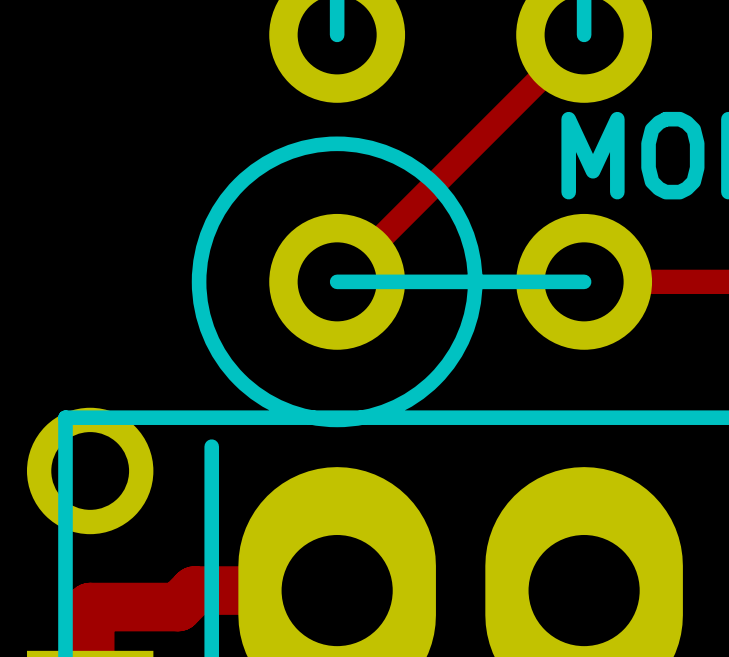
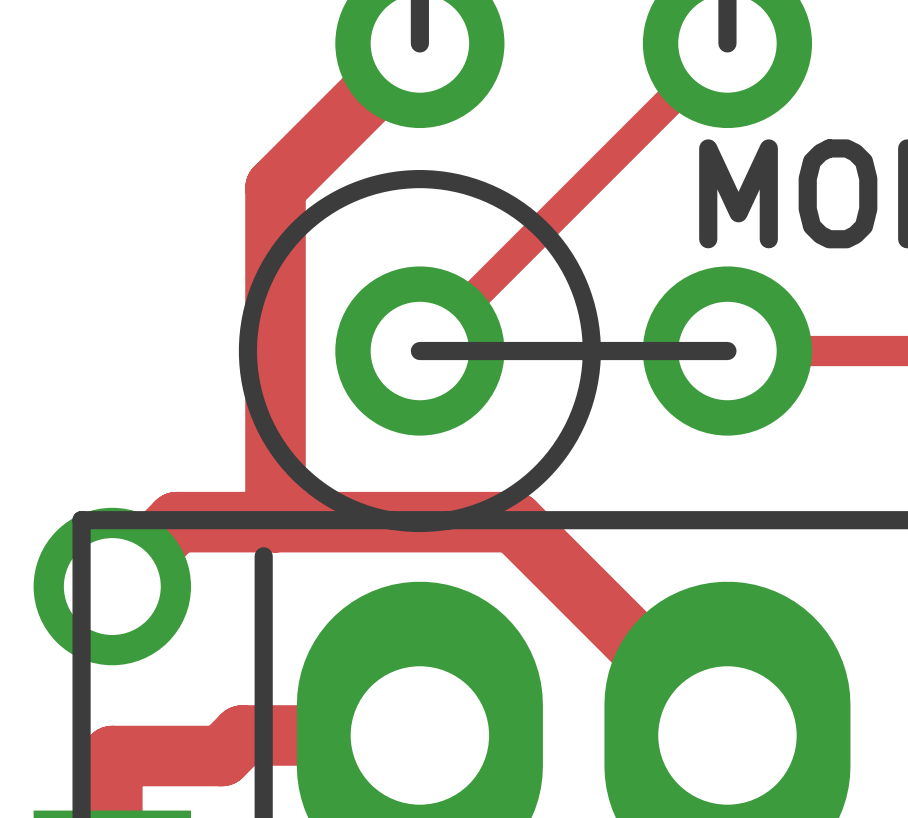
track: none -> (419, 43) (275, 187) (275, 522)
track: none -> (112, 586) (176, 522) (514, 522) (727, 735)

